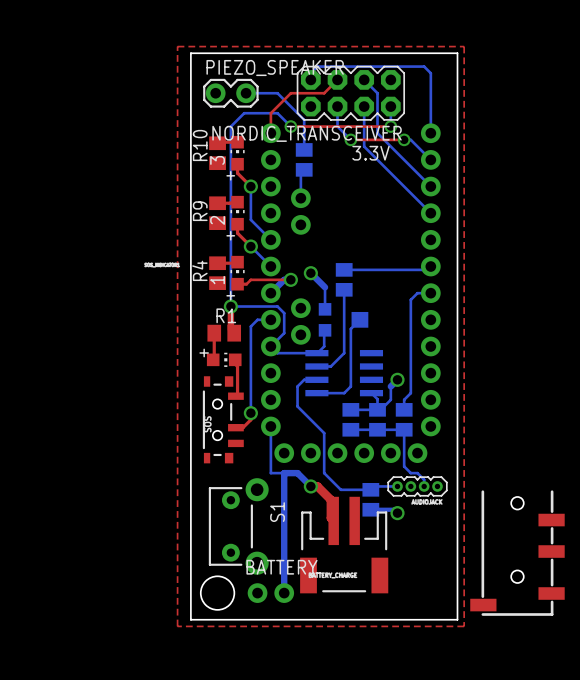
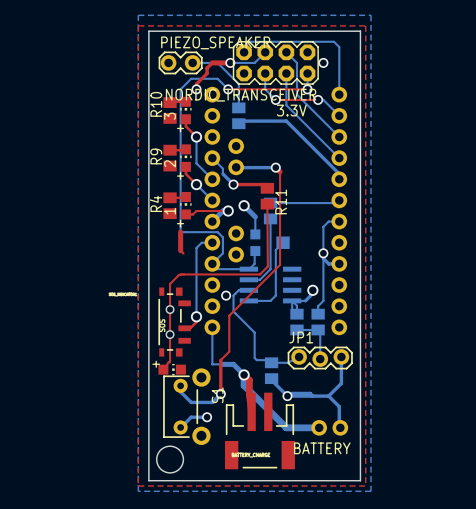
bottom zone outline: none -> (138, 15) (371, 15) (371, 491) (138, 491) (138, 15)
bottom track: none -> (265, 52) (254, 62) (230, 62)
top track: (337, 79) (324, 93) (293, 93) -> none
top track: (290, 93) (270, 113) (270, 133) -> (228, 62) (212, 62) (207, 68) (207, 73) (196, 84) (196, 89)
via: none -> (230, 62)
via: none -> (323, 62)
3.3V footprint: [261, 123, 441, 463] -> [204, 86, 348, 336]
via: none -> (196, 89)
bottom track: none -> (238, 123) (241, 121) (286, 121) (339, 173) (339, 179)
bottom track: (300, 173) (300, 198) -> none
bottom track: none -> (212, 158) (222, 168) (222, 173) (233, 184)
bottom track: none -> (236, 167) (275, 167)
top track: none -> (275, 167) (280, 171) (280, 264) (229, 315) (229, 351) (220, 360) (220, 393)
via: none -> (275, 167)
top track: none -> (233, 184) (266, 184) (267, 188)
via: none -> (233, 184)
R11: none -> (267, 196)
top track: none -> (267, 204) (267, 266) (259, 274) (184, 274)
via: (230, 306) -> none
top track: (214, 333) (213, 359) -> none
R1: (224, 333) -> none
bottom track: none -> (323, 253) (323, 258) (328, 263) (339, 263)
via: none -> (323, 253)
part position: (224, 359) -> (172, 369)
top track: (231, 359) (237, 366) (237, 394) (235, 396) -> (180, 274) (170, 283) (170, 362) (163, 369)
bottom track: (397, 379) (390, 386) (390, 399) (380, 409) (372, 409) -> none
via: none -> (226, 295)
bottom track: (350, 409) (371, 409) -> (311, 294) (305, 300) (292, 300) (292, 314)
part: (350, 419) -> none
bottom track: (350, 429) (372, 429) -> none
bottom track: (404, 429) (404, 466) (410, 473) (417, 473) (424, 479) (424, 486) -> (318, 329) (320, 332) (320, 359)
bottom track: none -> (341, 356) (341, 383) (328, 396)
bottom track: (324, 465) (324, 473) (340, 489) (370, 489) (374, 486) (397, 486) -> (254, 358) (256, 360) (268, 360) (271, 362) (288, 362) (299, 356)
JP1: none -> (320, 358)
bottom track: (284, 473) (284, 593) -> none
part: none -> (271, 370)
bottom track: none -> (244, 374) (244, 385) (286, 427) (319, 427)
top track: (310, 486) (317, 486) (330, 499) (330, 518) (333, 520) -> (244, 374) (249, 380) (251, 411)
part: (417, 486) -> none
bottom track: none -> (271, 378) (287, 396) (328, 396)
part: (370, 499) -> none
bottom track: none -> (180, 389) (180, 391) (191, 402) (212, 402) (220, 393)
via: none -> (220, 393)
via: none -> (287, 396)
via: (397, 513) -> none
bottom track: none -> (328, 396) (339, 406) (340, 427)
bottom track: none -> (207, 417) (191, 417) (180, 427) (180, 430)
via: none -> (207, 417)
part position: (344, 545) -> (259, 430)
part: (517, 553) -> none
BATTERY name position: BATTERY (282, 567) -> BATTERY (322, 448)
BATTERY position: (270, 593) -> (329, 427)

